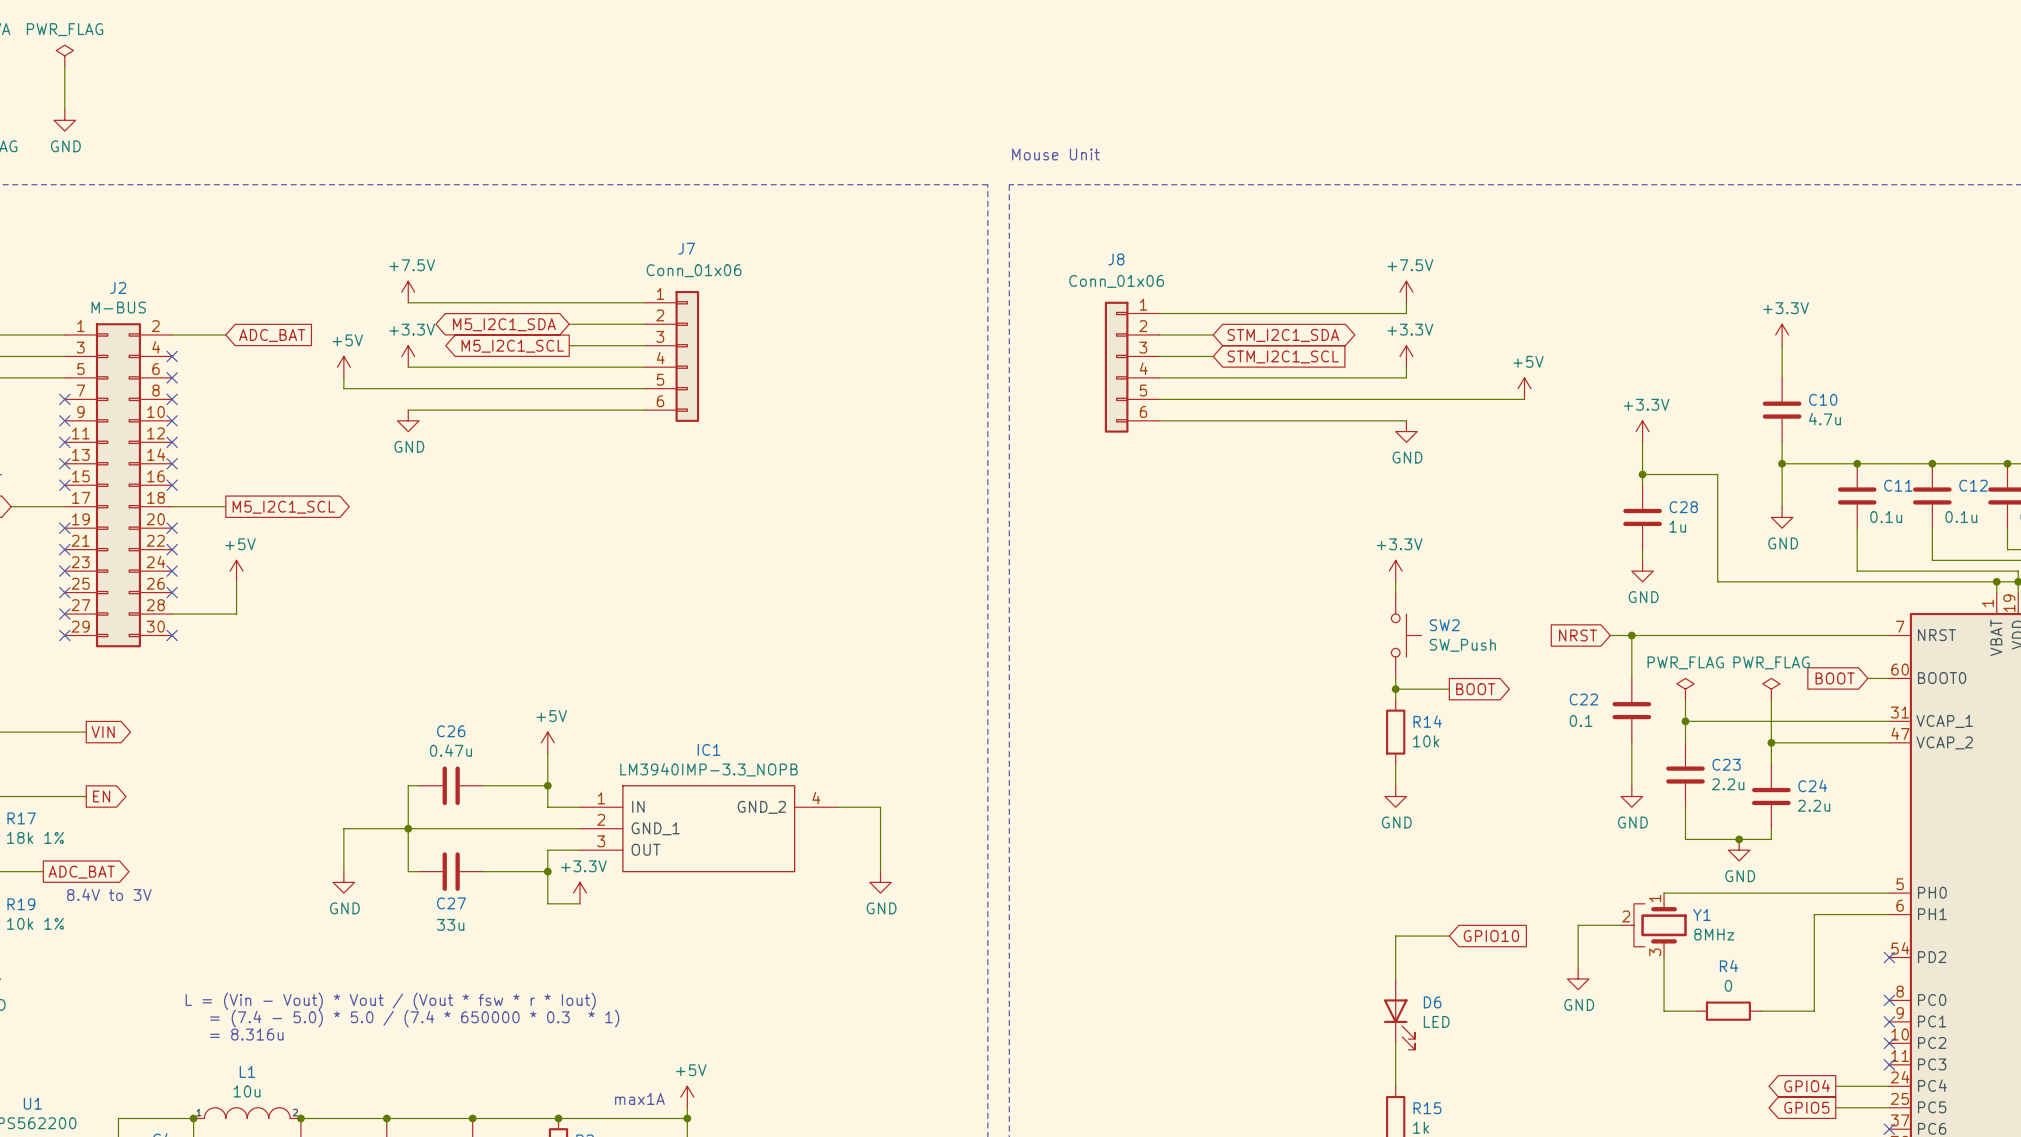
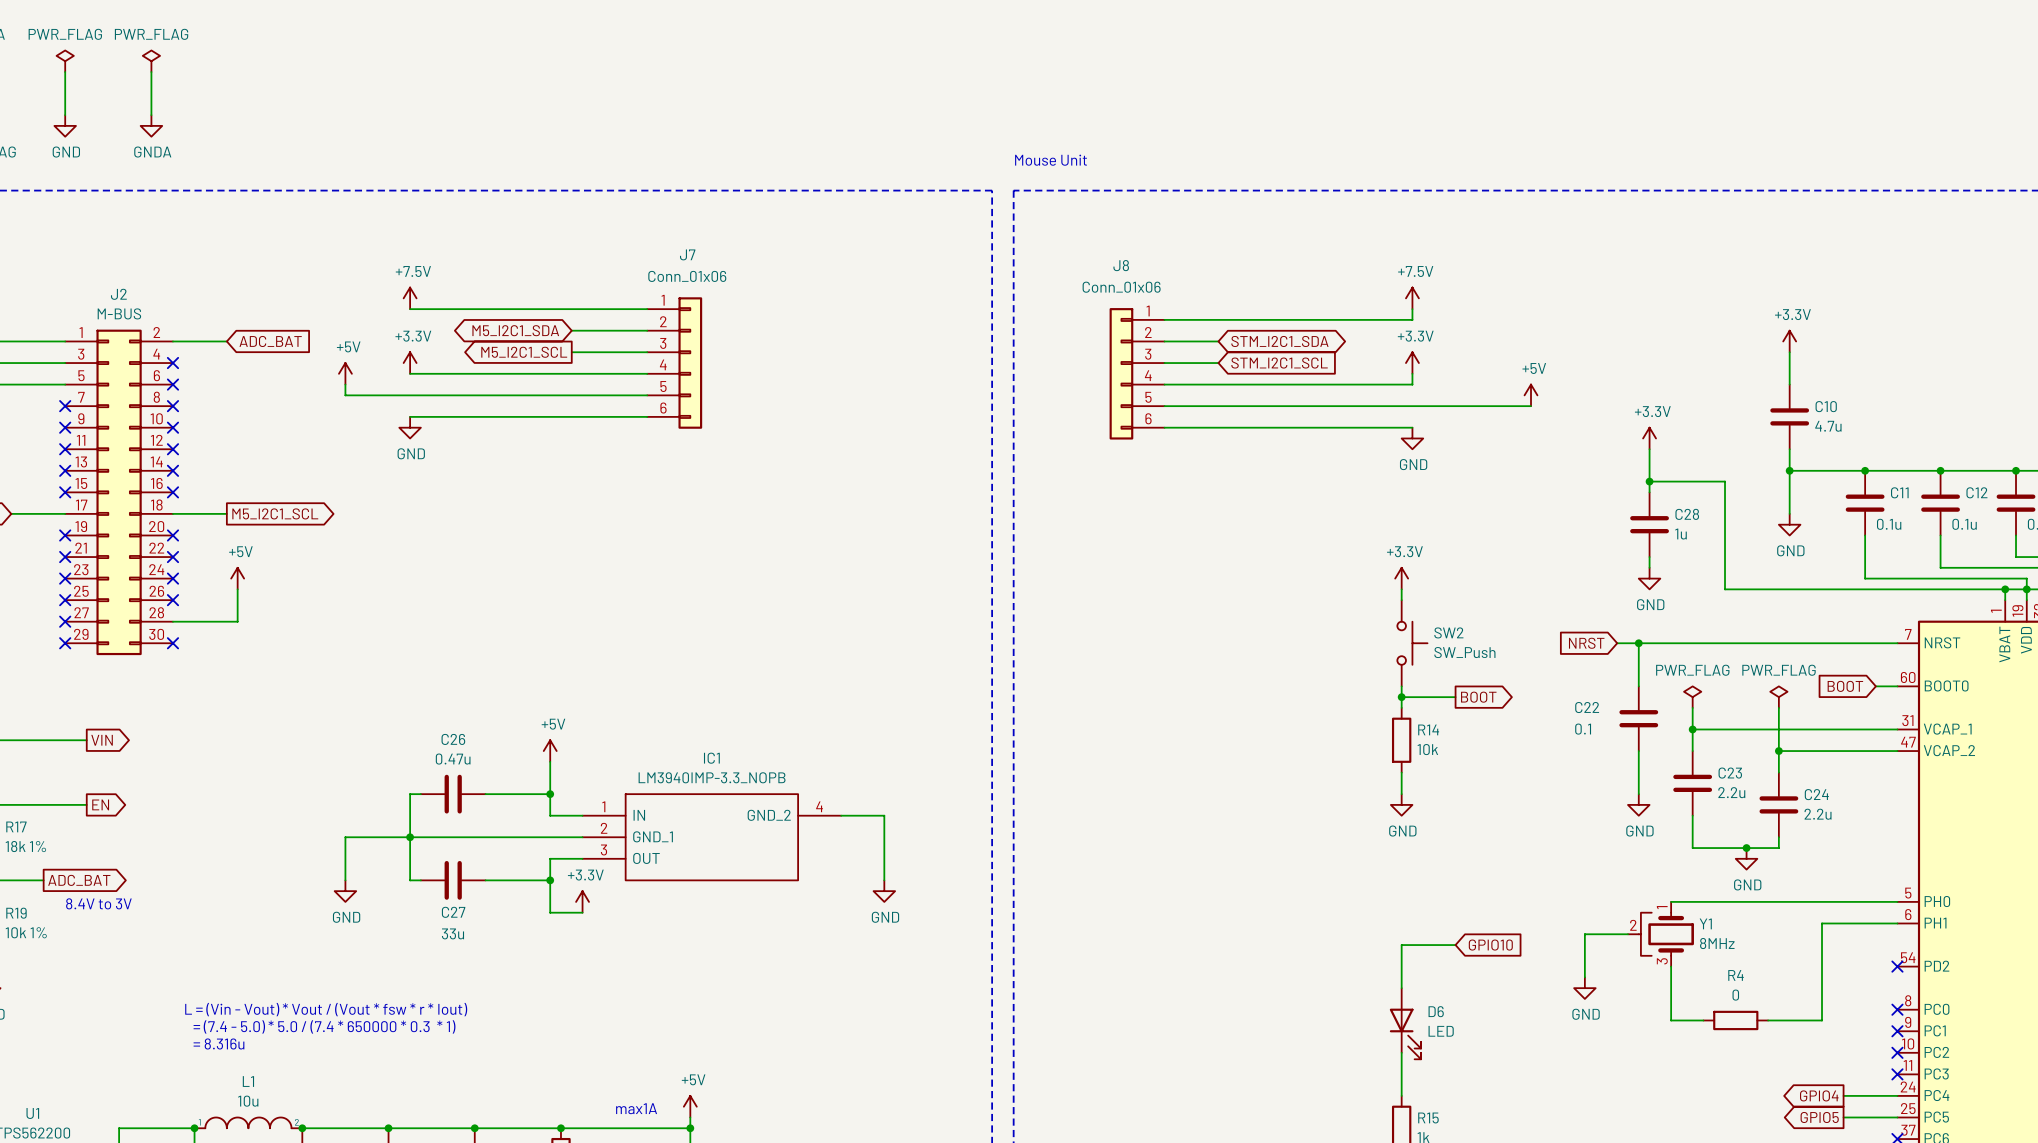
power symbol: none -> PWR_FLAG (151, 61)
wire: none -> (151, 72) (151, 115)
power symbol: none -> GNDA (151, 125)

